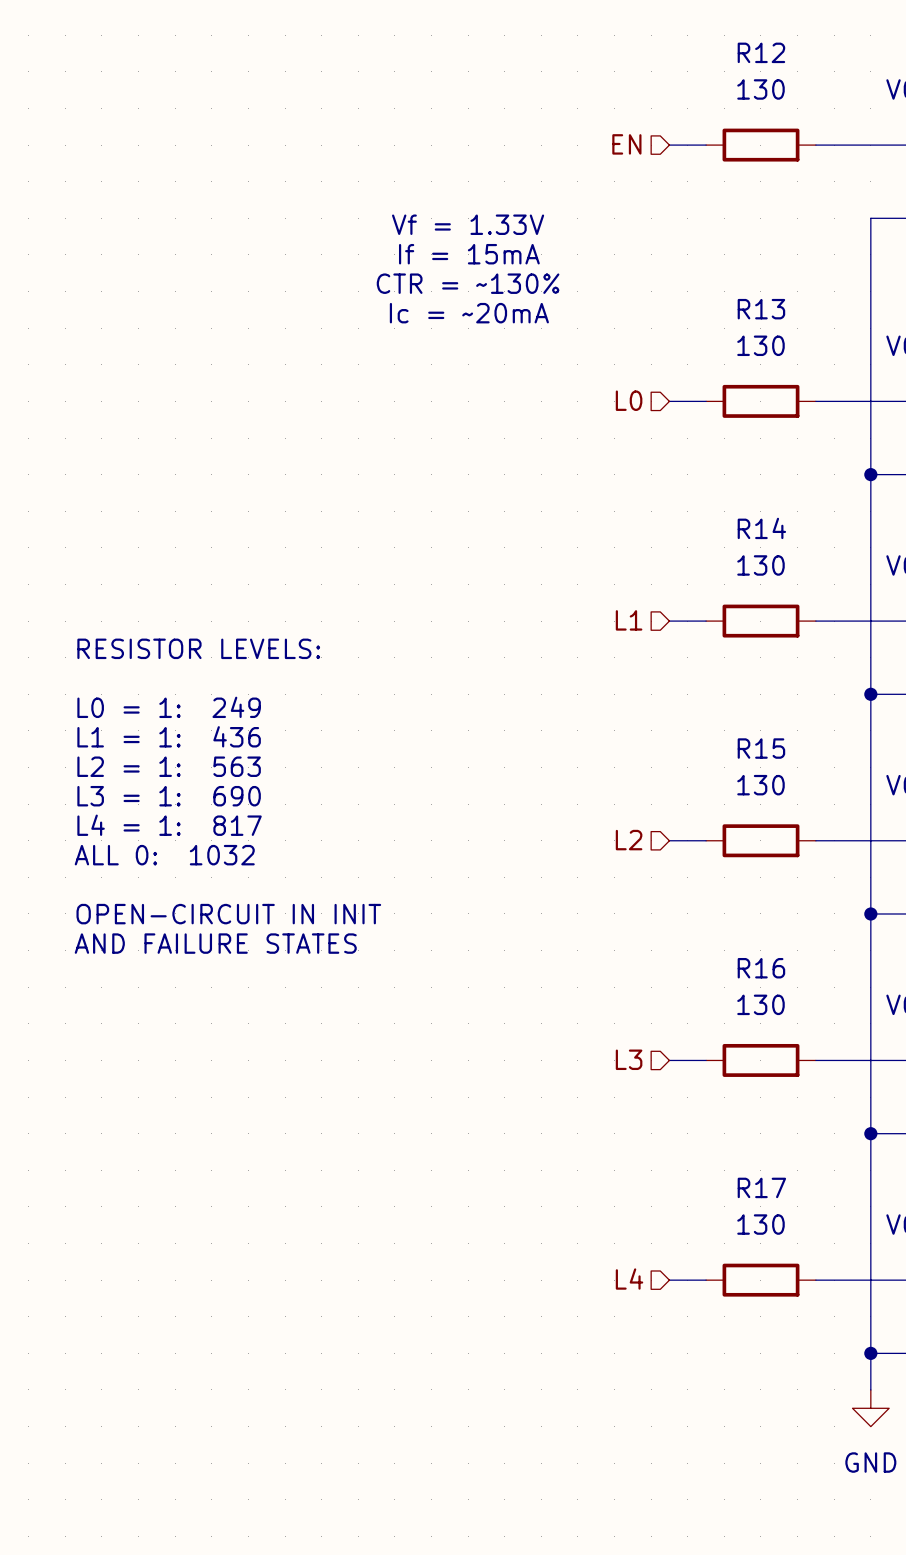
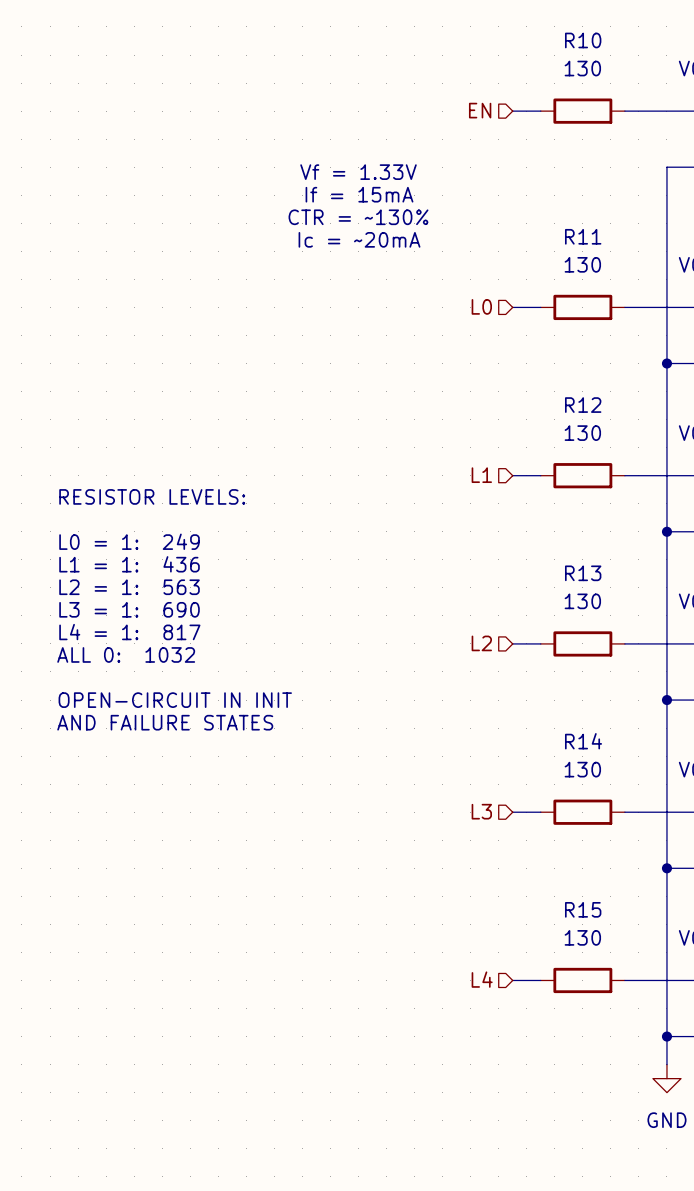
R12 name: R12 (761, 52) -> R10 (583, 40)
R13 name: R13 (761, 309) -> R11 (583, 236)
R14 name: R14 (761, 528) -> R12 (583, 405)
R15 name: R15 (761, 748) -> R13 (583, 573)
R16 name: R16 (761, 968) -> R14 (583, 741)
R17 name: R17 (761, 1187) -> R15 (583, 909)

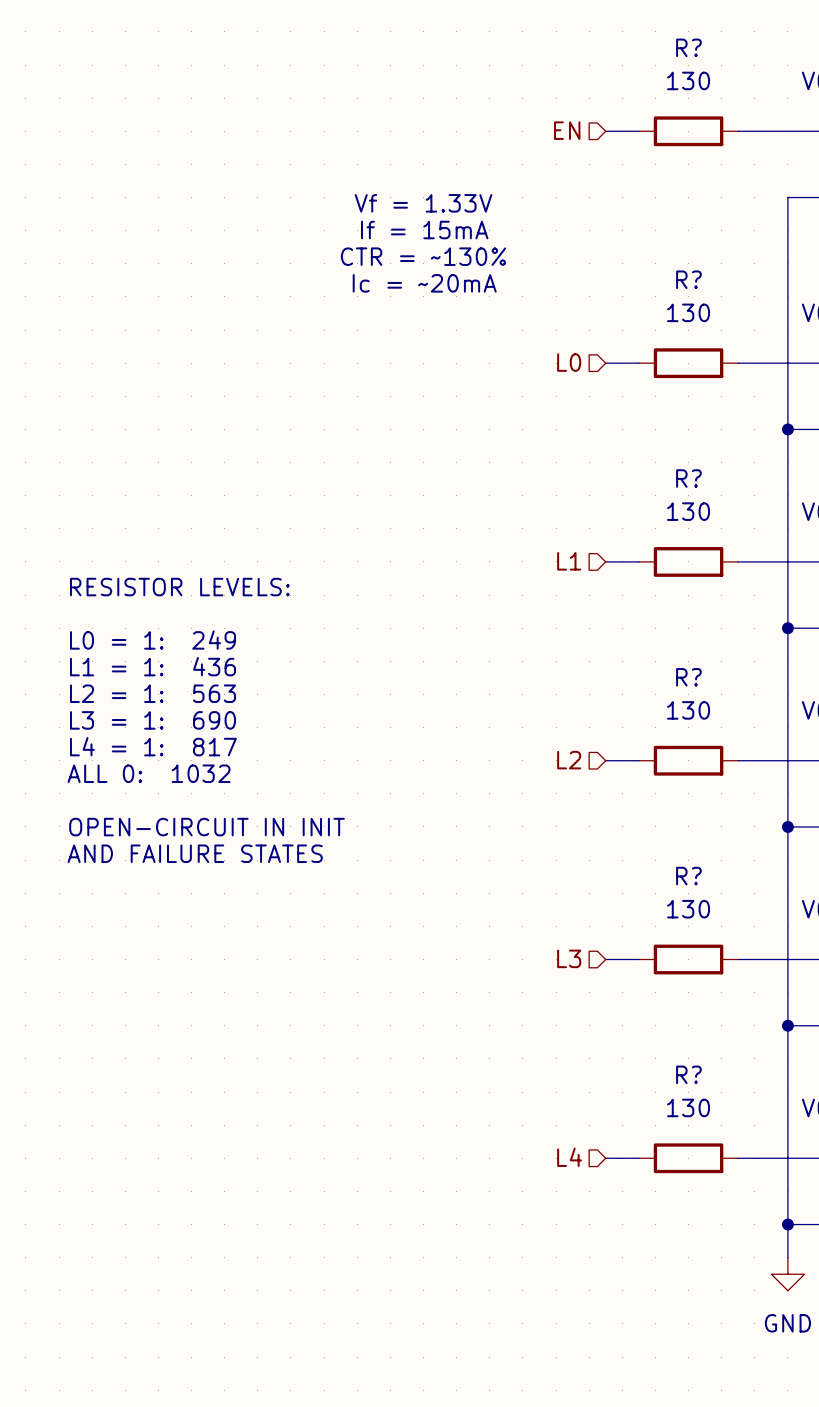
R10 name: R10 (583, 40) -> R? (688, 47)
R11 name: R11 (583, 236) -> R? (688, 279)
R12 name: R12 (583, 405) -> R? (688, 478)
R13 name: R13 (583, 573) -> R? (688, 677)
R14 name: R14 (583, 741) -> R? (688, 876)
R15 name: R15 (583, 909) -> R? (688, 1074)

